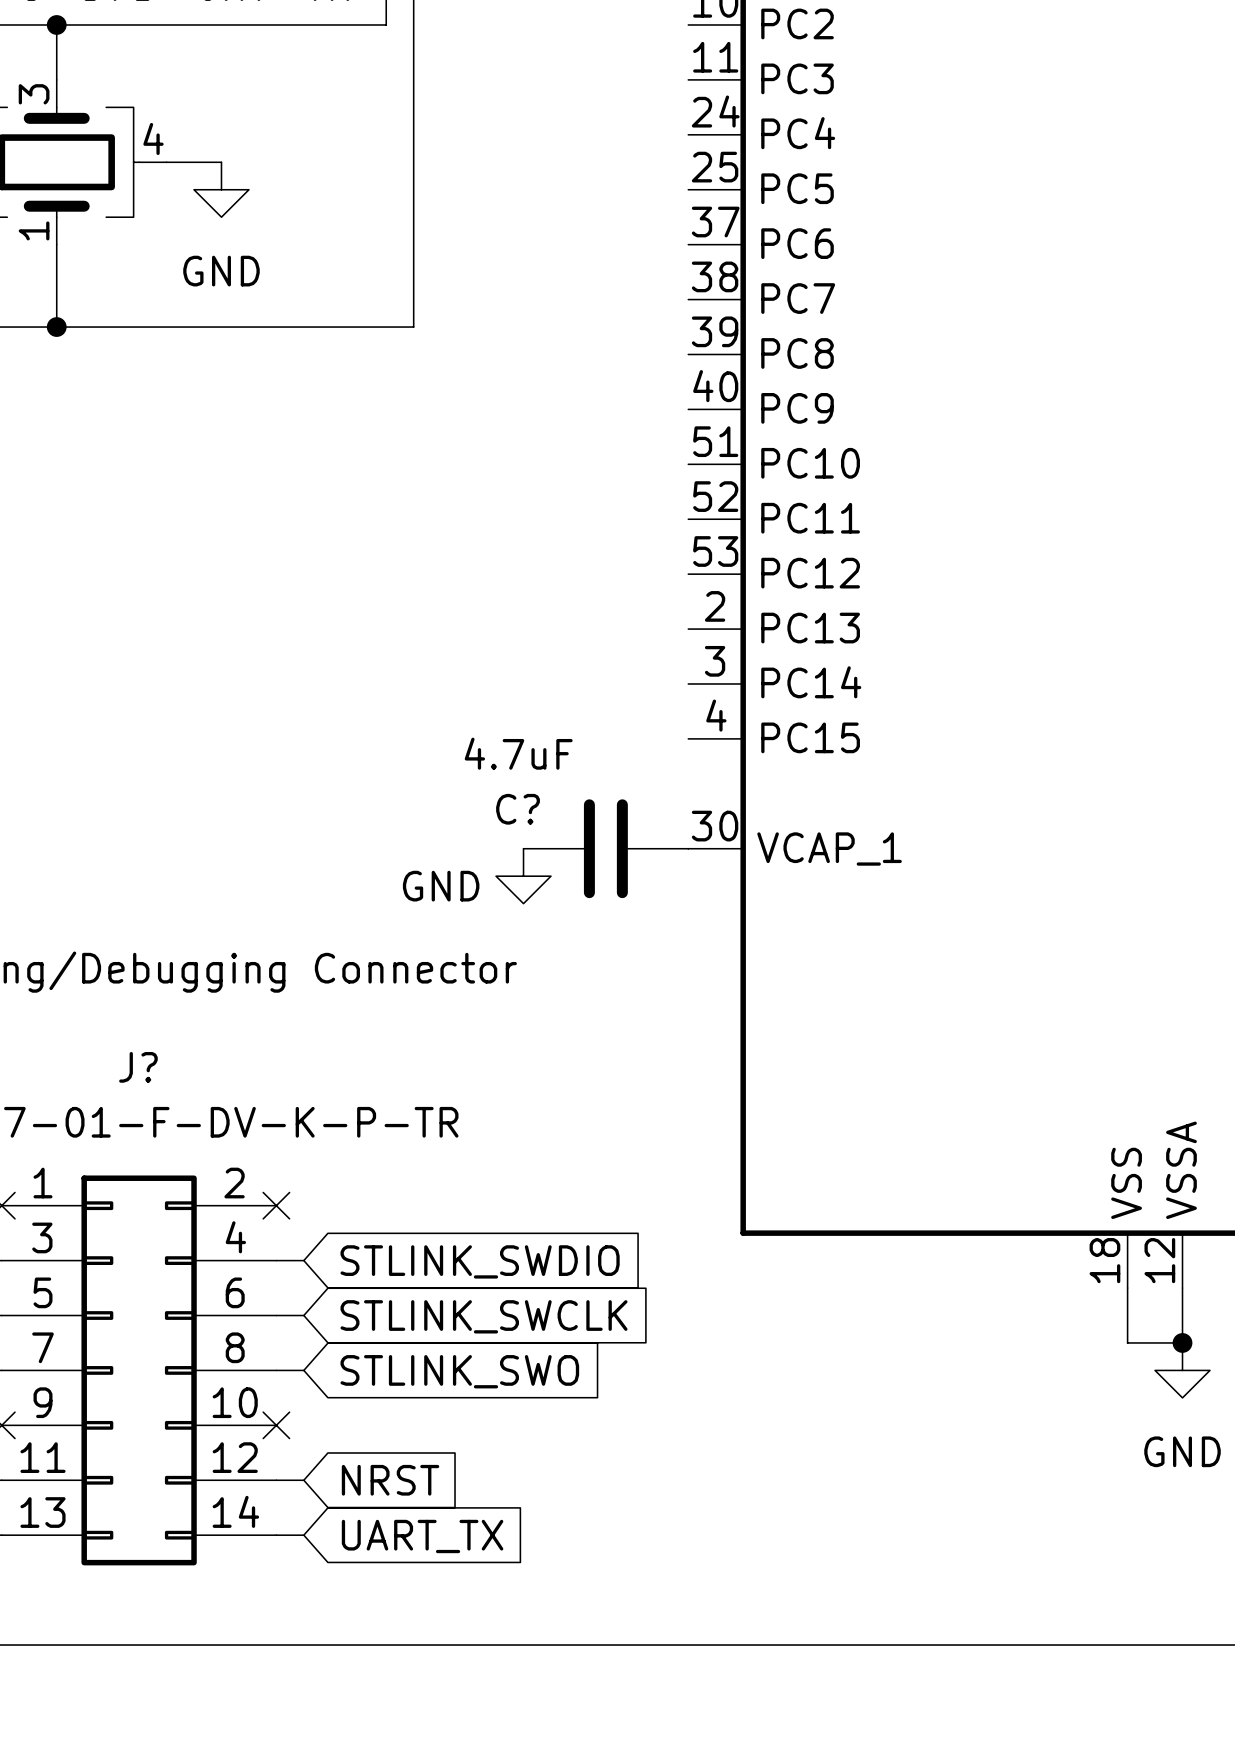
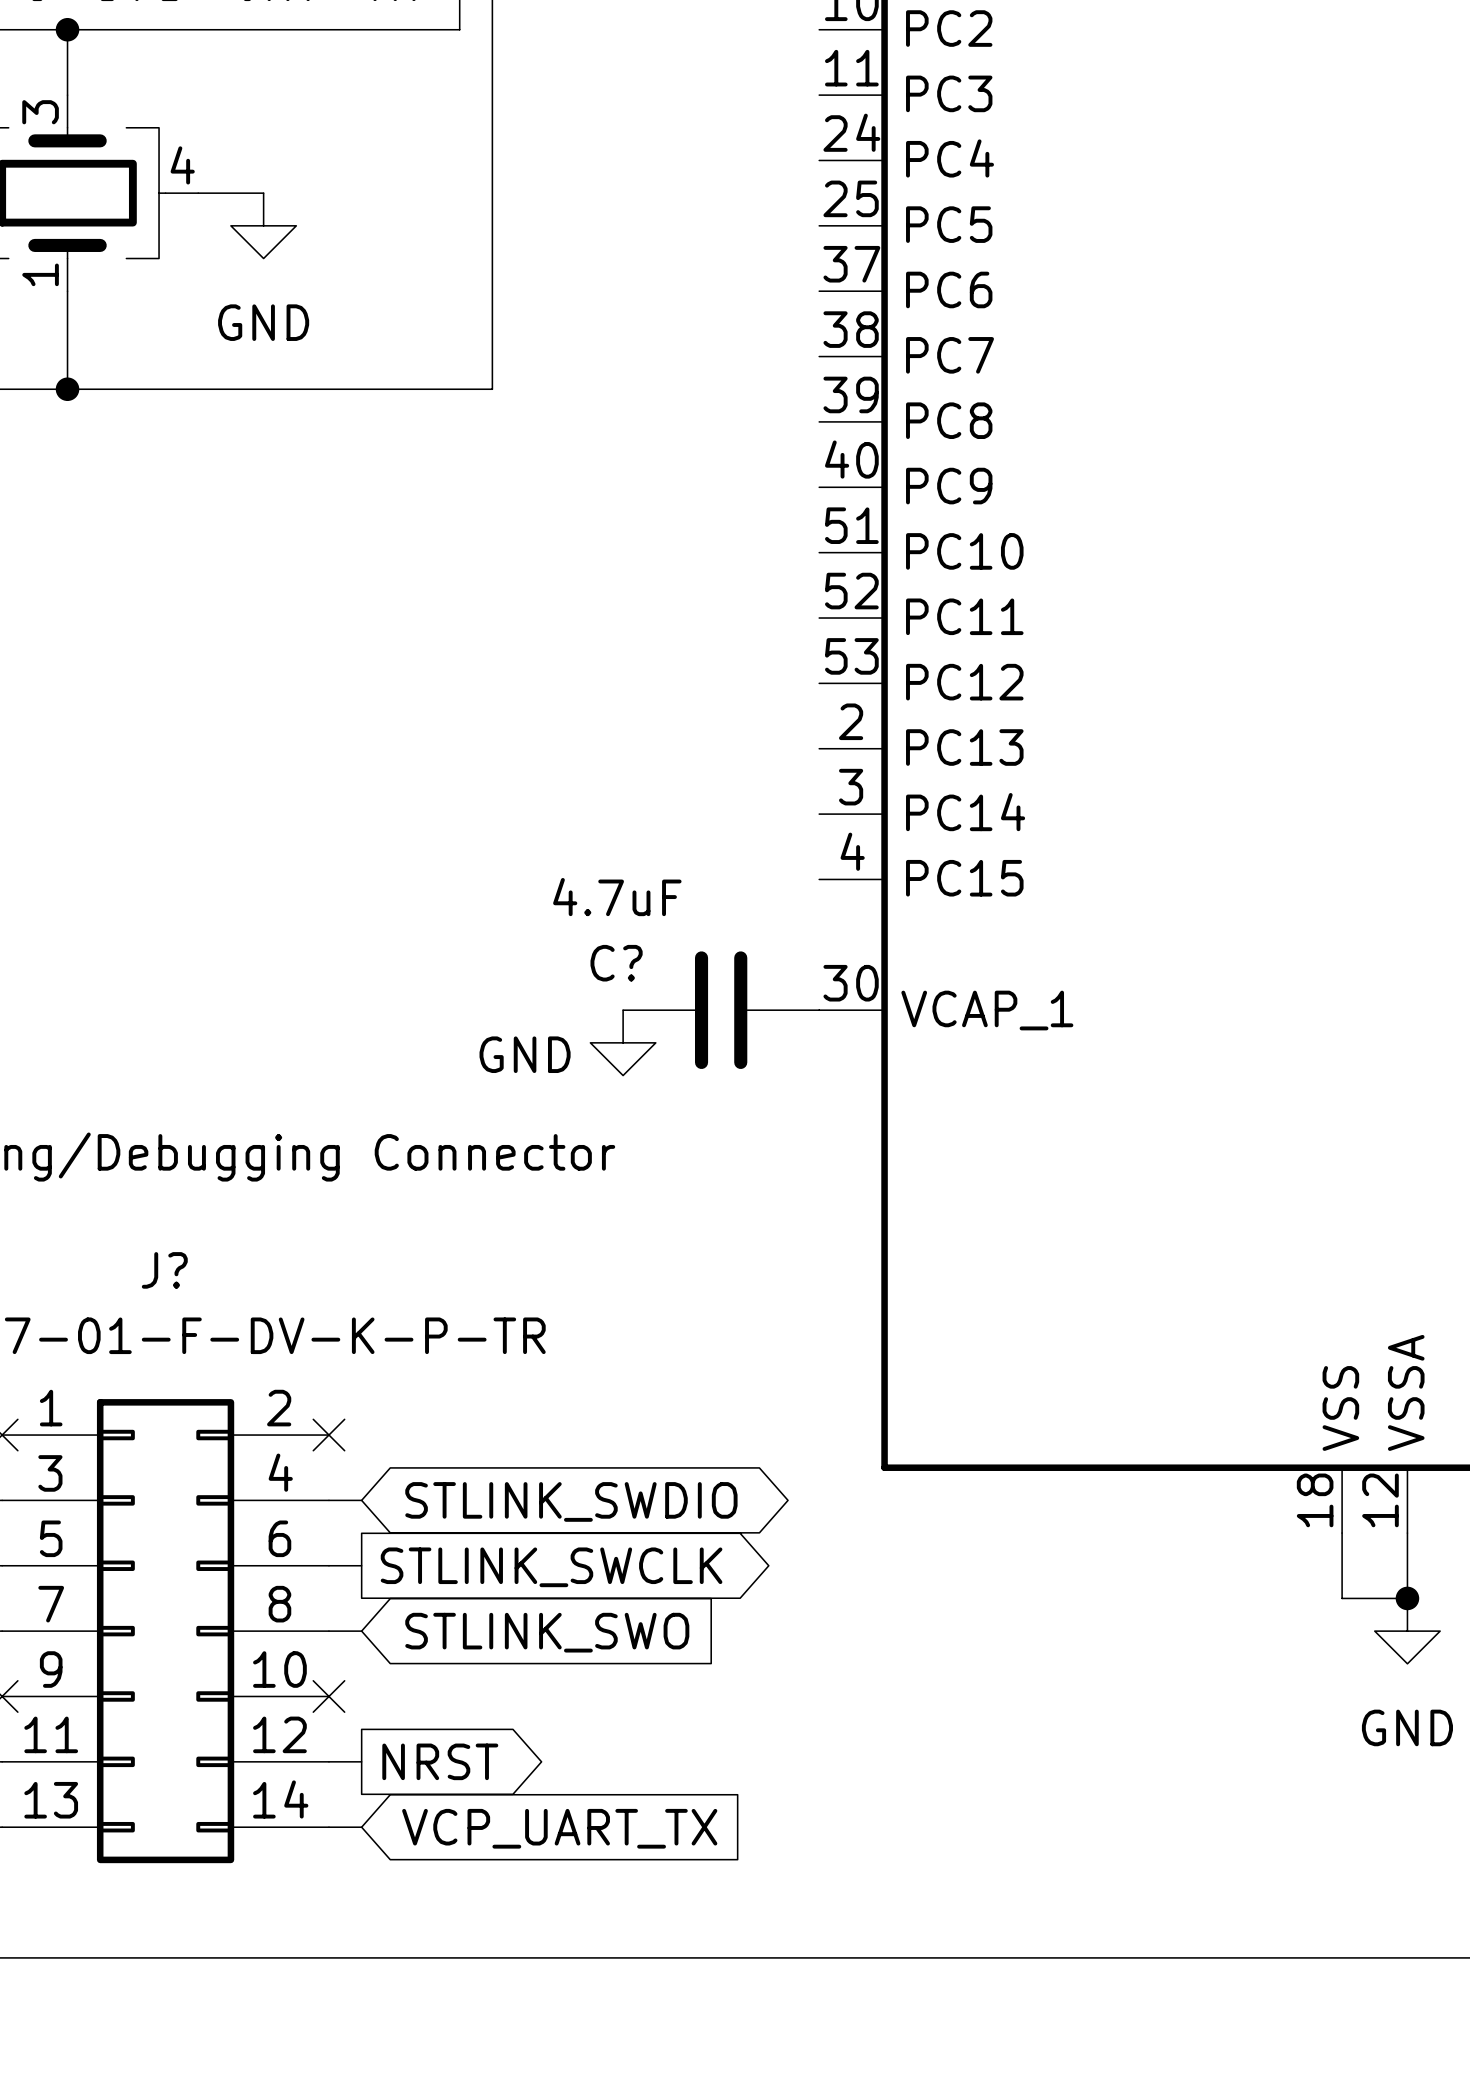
global label shape: input (480, 1261) -> bidirectional (571, 1501)
global label shape: input (484, 1316) -> output (551, 1567)
global label shape: input (390, 1480) -> output (440, 1761)
global label: UART_TX (422, 1536) -> VCP_UART_TX (559, 1828)

